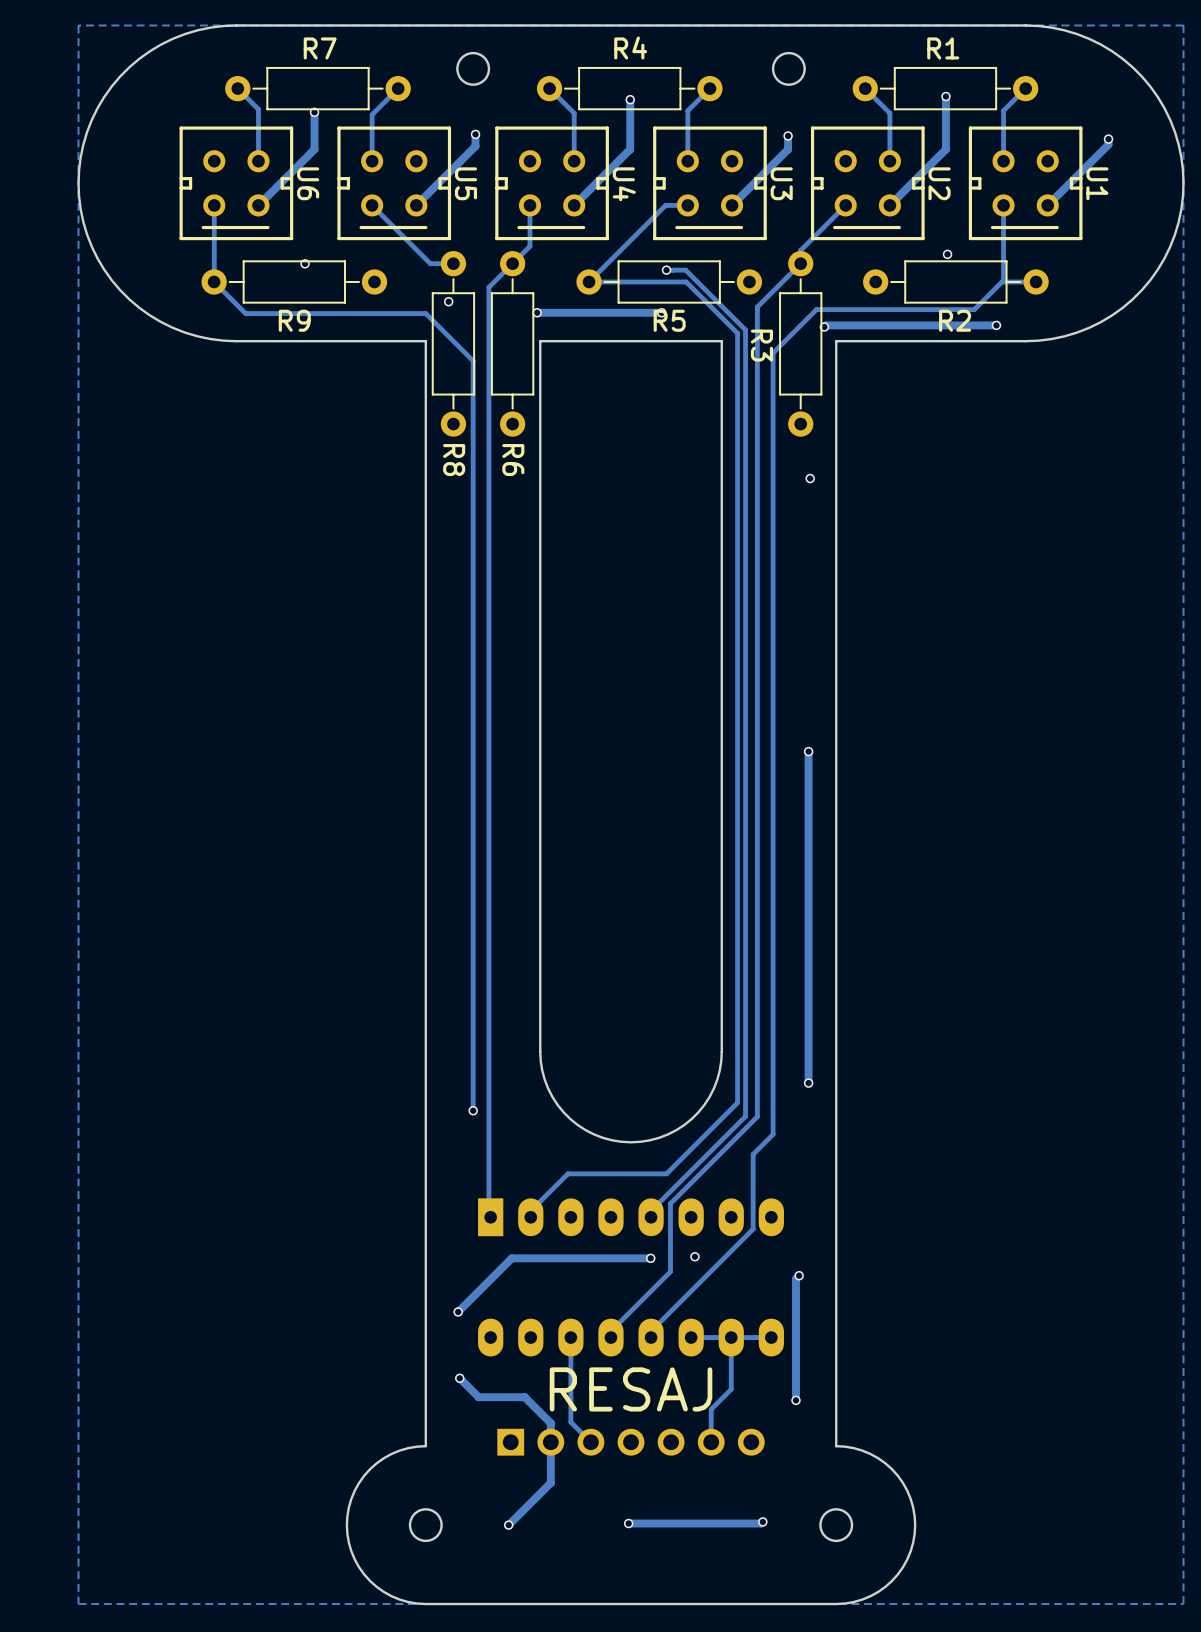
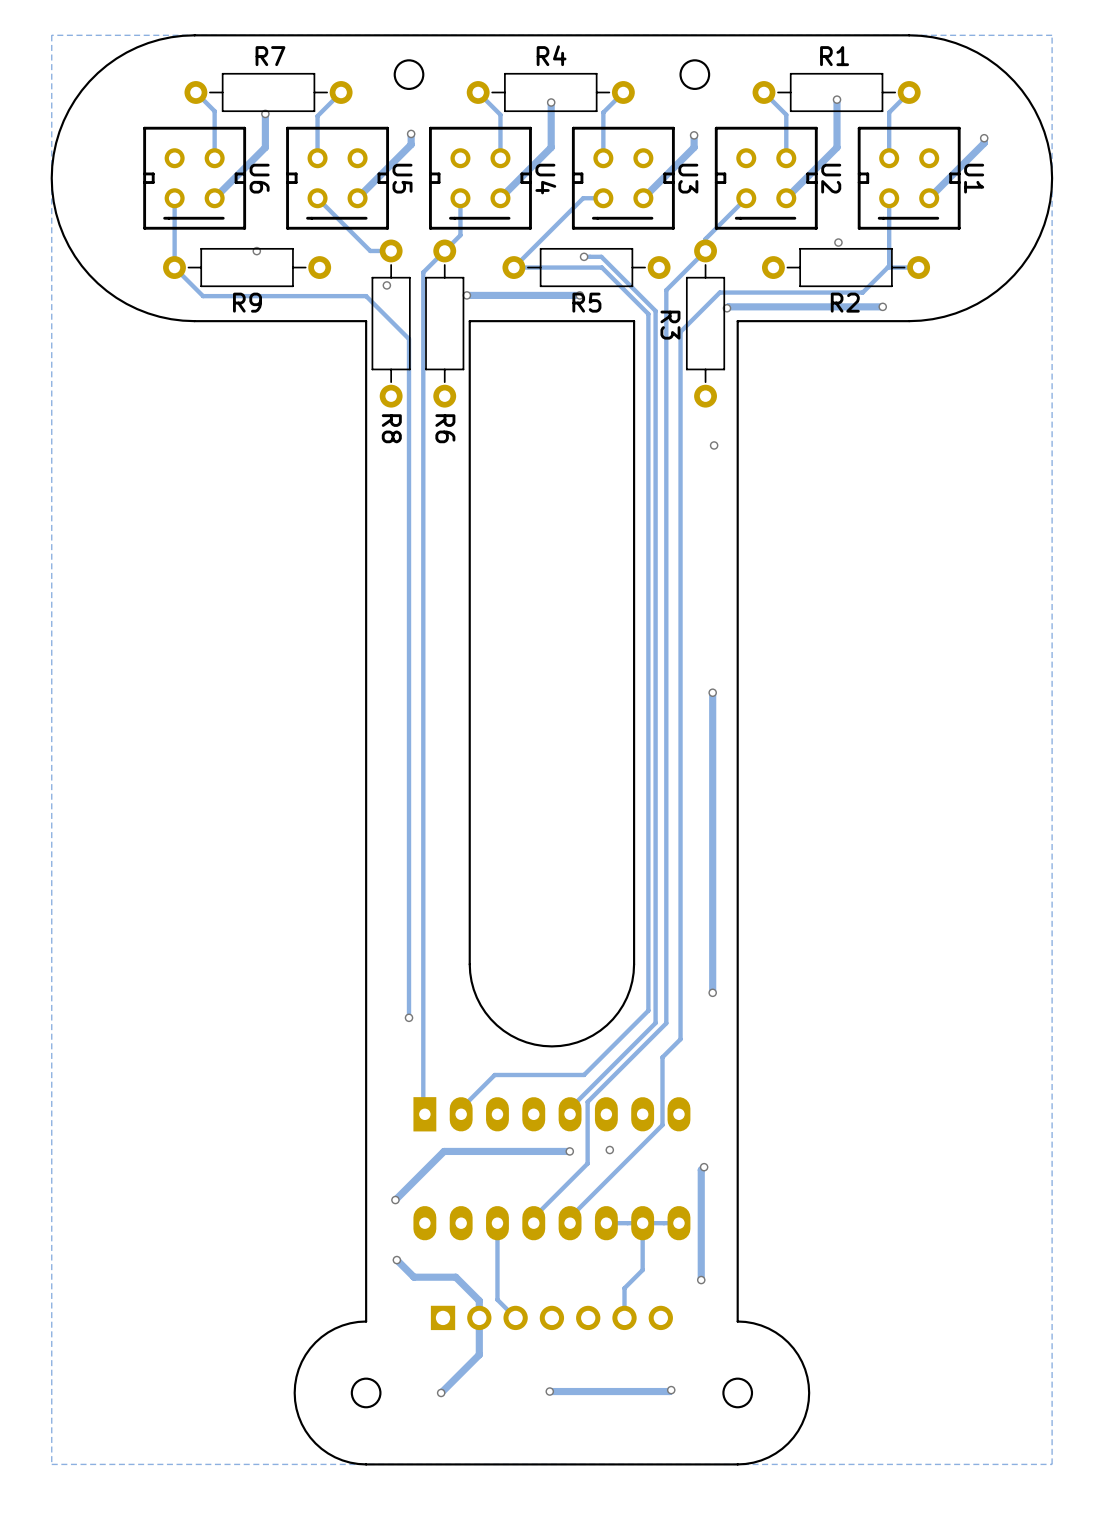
text: RESAJ (631, 1389) -> none

